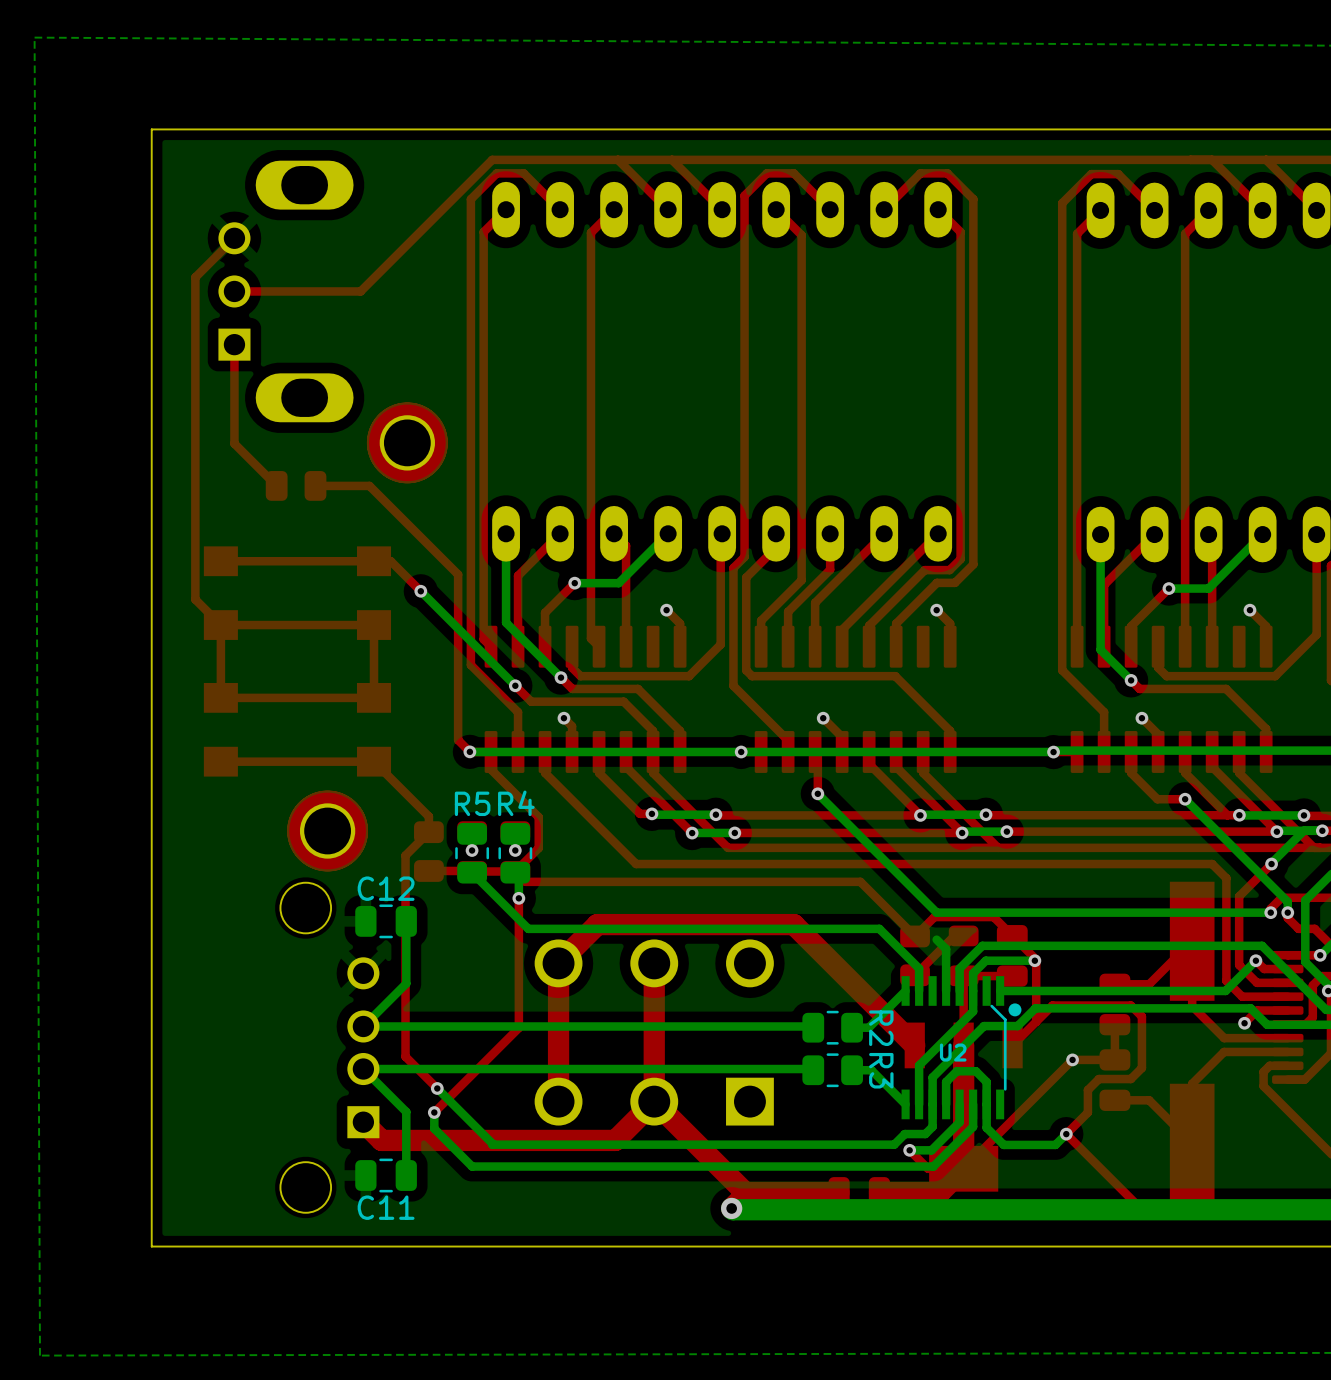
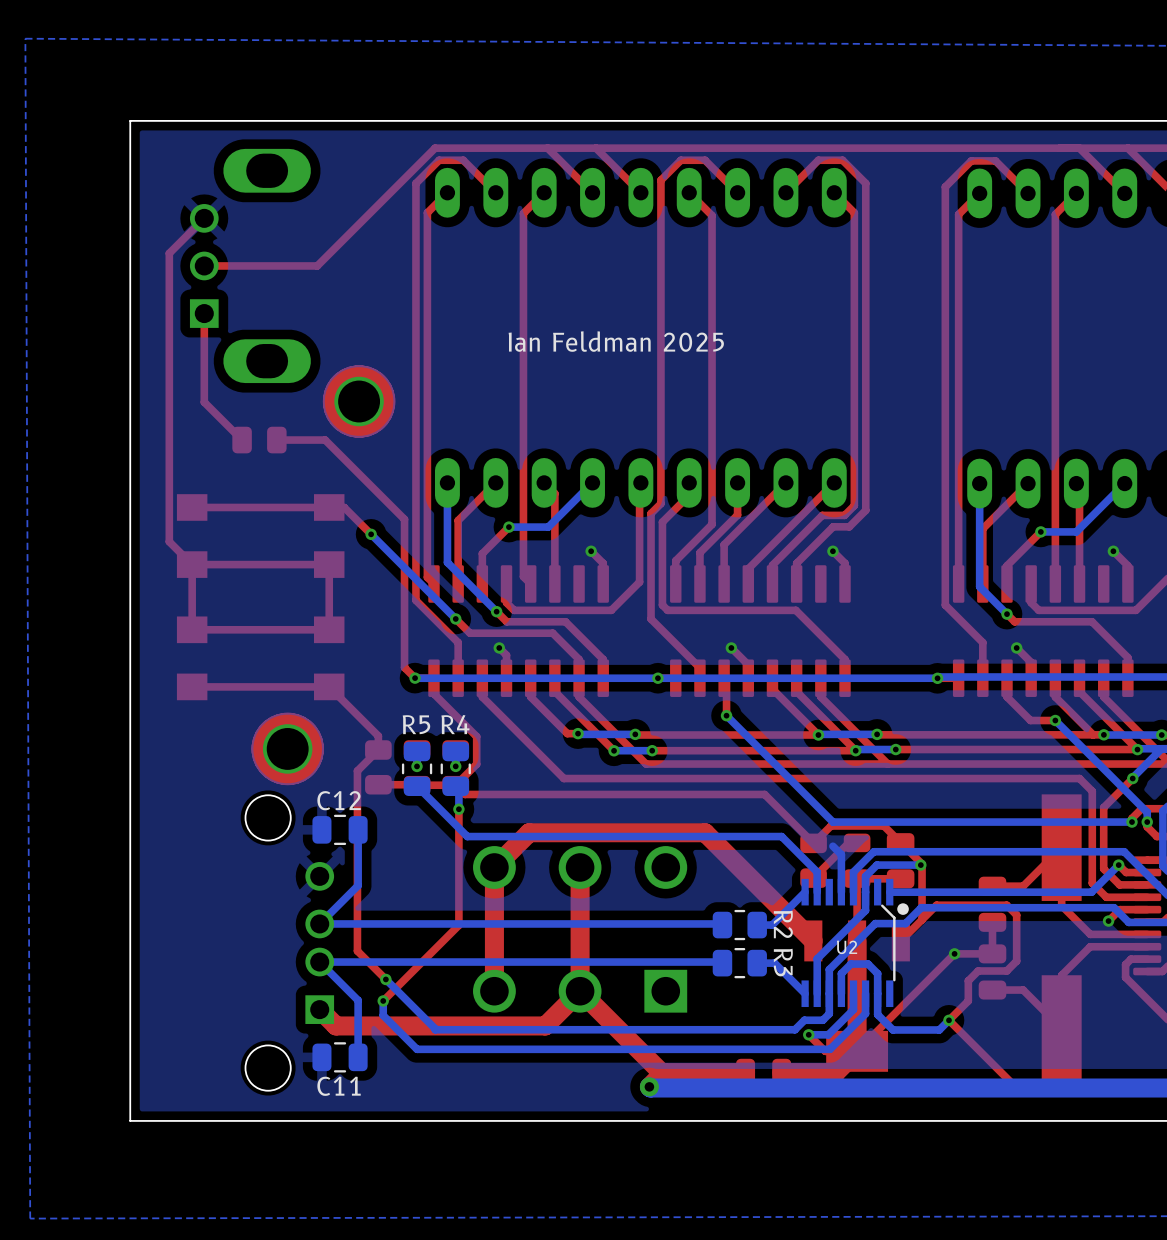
text: none -> Ian Feldman 2025 (616, 341)

